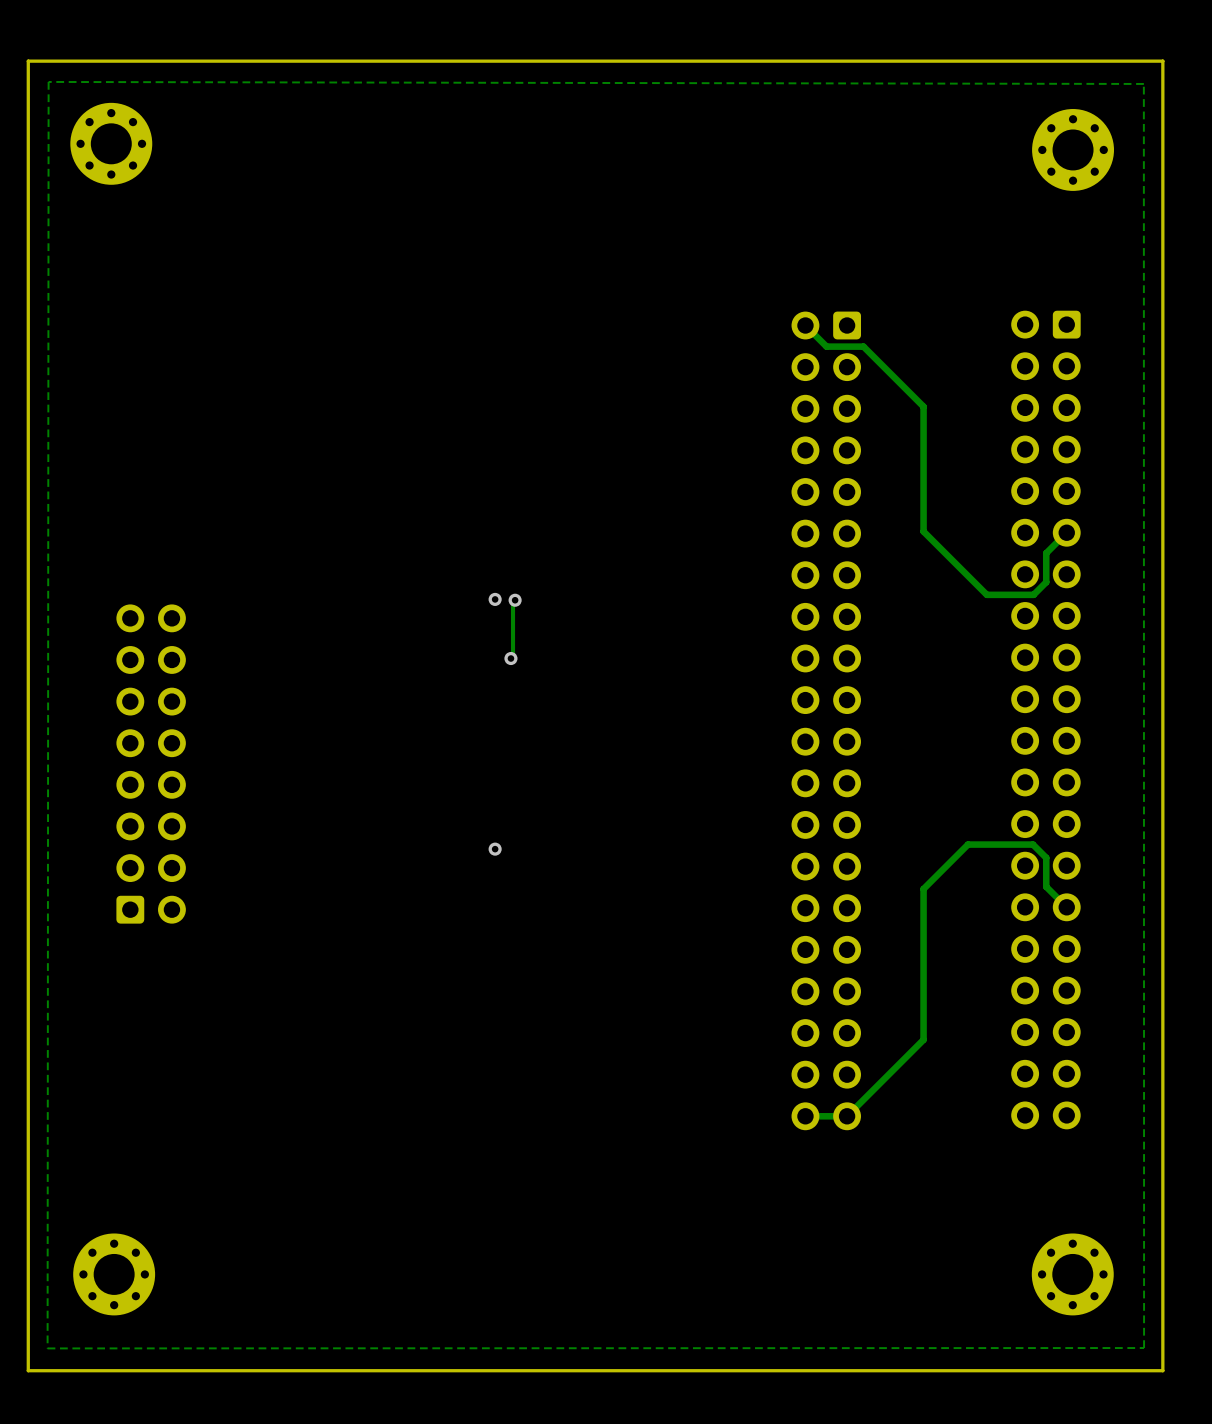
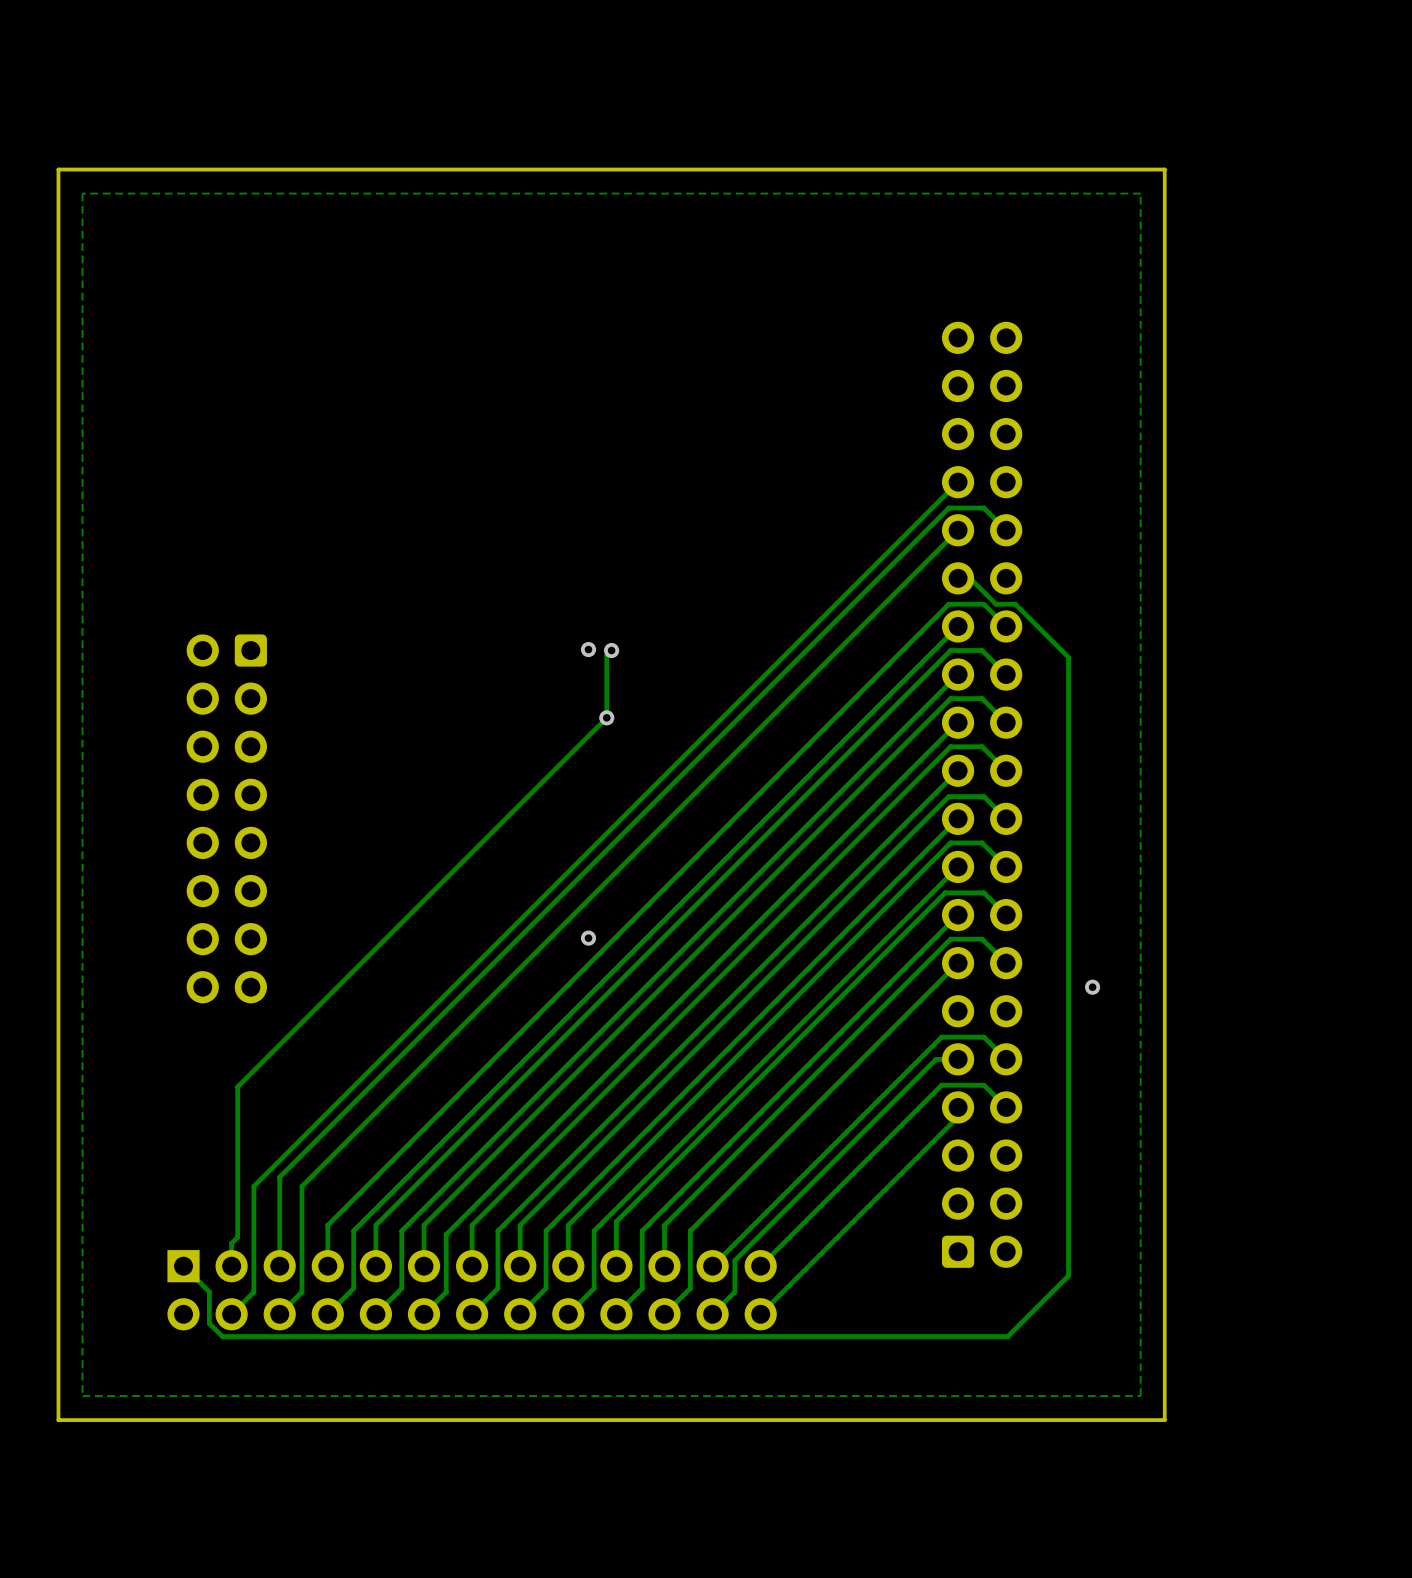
board edge: (1162, 61) (28, 61) (28, 1370) (1162, 1370) (1162, 61) -> (1164, 169) (1164, 1420) (58, 1420) (58, 169) (1164, 169)
zone outline: (48, 81) (1143, 83) (1144, 1348) (47, 1348) (48, 81) -> (1140, 193) (1140, 1396) (82, 1396) (82, 193) (1140, 193)
part: (111, 143) -> none
part: (1073, 149) -> none
track: (805, 325) (826, 346) (863, 346) (923, 406) (923, 531) (986, 594) (1033, 594) (1046, 582) (1046, 553) (1066, 532) -> none
track: none -> (958, 482) (253, 1186) (253, 1292) (231, 1314)
track: none -> (958, 530) (301, 1186) (301, 1292) (279, 1314)
track: none -> (1006, 530) (983, 508) (948, 508) (279, 1177) (279, 1266)
track: none -> (958, 578) (970, 578) (995, 604) (1015, 604) (1068, 657) (1068, 1275) (1007, 1336) (222, 1336) (209, 1323) (209, 1292) (183, 1266)
track: none -> (958, 626) (353, 1230) (353, 1288) (327, 1314)
track: none -> (1006, 626) (983, 604) (948, 604) (327, 1225) (327, 1266)
track: (513, 602) (513, 656) (510, 658) -> (609, 652) (606, 655) (606, 717) (237, 1086) (237, 1237) (231, 1243) (231, 1266)
track: none -> (958, 674) (401, 1230) (401, 1288) (375, 1314)
track: none -> (1006, 674) (982, 650) (950, 650) (375, 1225) (375, 1266)
track: none -> (958, 722) (446, 1234) (446, 1292) (424, 1314)
track: none -> (1006, 722) (982, 698) (950, 698) (424, 1225) (424, 1266)
track: none -> (958, 770) (497, 1230) (497, 1288) (472, 1314)
track: none -> (1006, 770) (982, 746) (950, 746) (472, 1225) (472, 1266)
part rotation: 0° (826, 720) -> 180° (982, 794)
part: (1045, 720) -> none
track: none -> (958, 818) (546, 1230) (546, 1288) (520, 1314)
track: none -> (1006, 818) (983, 796) (948, 796) (520, 1225) (520, 1266)
part rotation: 0° (151, 764) -> 180° (226, 818)
track: none -> (958, 866) (594, 1230) (594, 1288) (568, 1314)
track: none -> (1006, 866) (982, 842) (950, 842) (568, 1225) (568, 1266)
track: none -> (958, 915) (642, 1230) (642, 1288) (616, 1314)
track: none -> (1006, 915) (983, 892) (945, 892) (616, 1221) (616, 1266)
track: none -> (958, 963) (690, 1230) (690, 1288) (664, 1314)
track: none -> (1006, 963) (982, 939) (950, 939) (664, 1225) (664, 1266)
via: none -> (1092, 987)
track: (1066, 907) (1046, 886) (1046, 857) (1033, 844) (968, 844) (923, 889) (923, 1039) (847, 1116) (805, 1116) -> none
track: none -> (958, 1059) (936, 1059) (734, 1260) (734, 1292) (712, 1314)
track: none -> (1006, 1059) (983, 1037) (941, 1037) (712, 1266)
track: none -> (958, 1107) (958, 1116) (760, 1314)
track: none -> (1006, 1107) (983, 1085) (941, 1085) (760, 1266)
part: none -> (472, 1290)
part: (114, 1274) -> none
part: (1072, 1274) -> none

